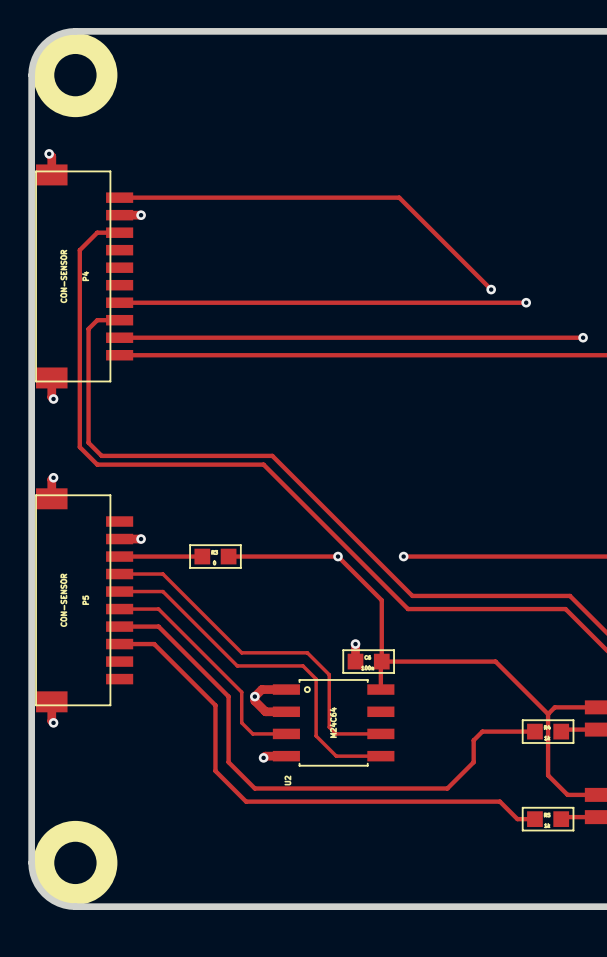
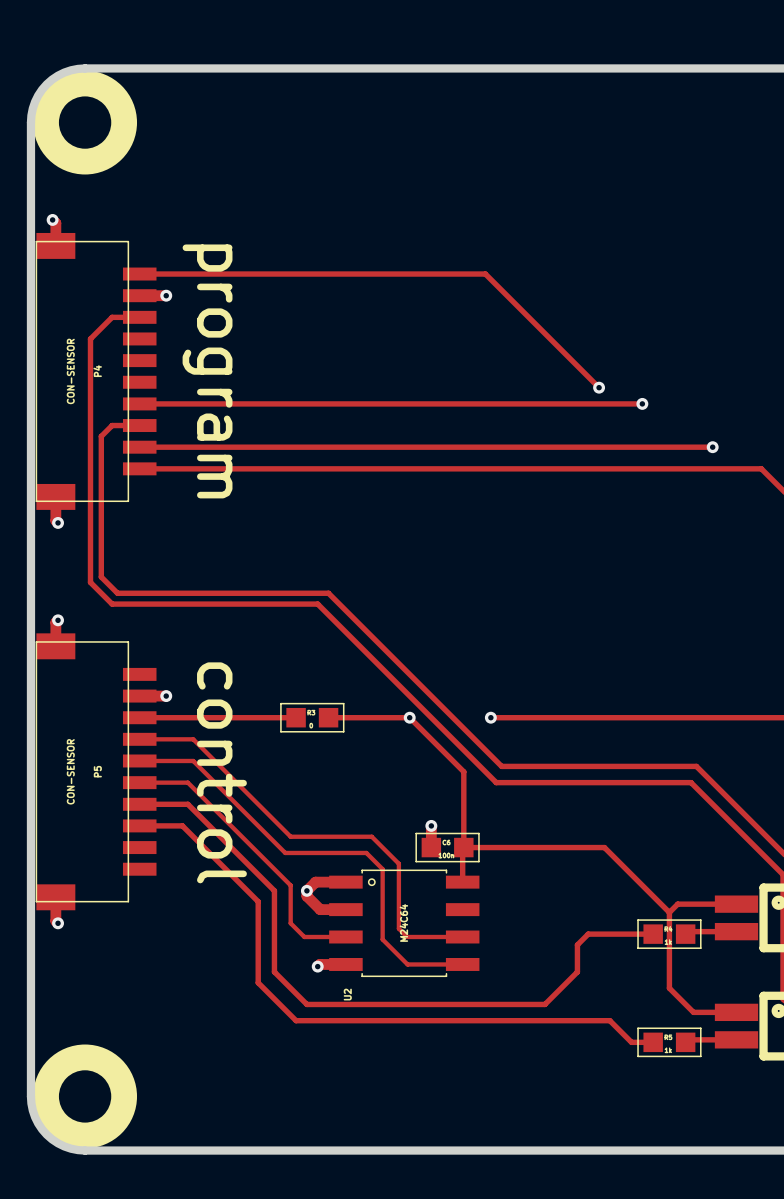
text: none -> program (207, 371)
track: (119, 556) (202, 556) -> (139, 717) (296, 717)
part position: (215, 556) -> (312, 717)
track: (228, 556) (272, 556) -> none
text: none -> control (221, 772)

